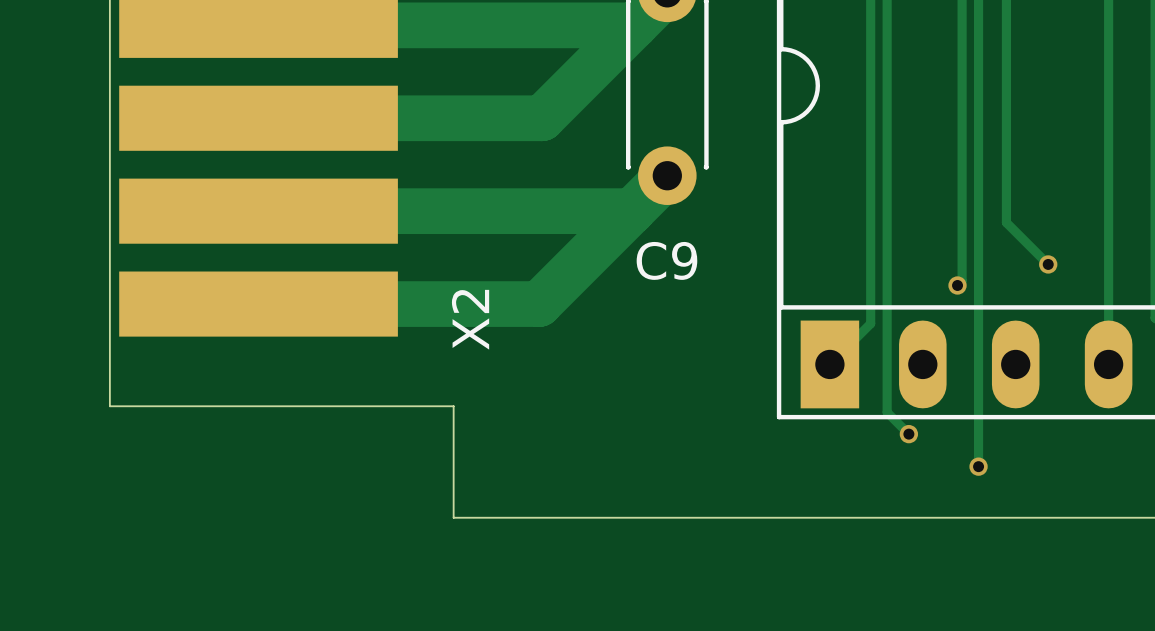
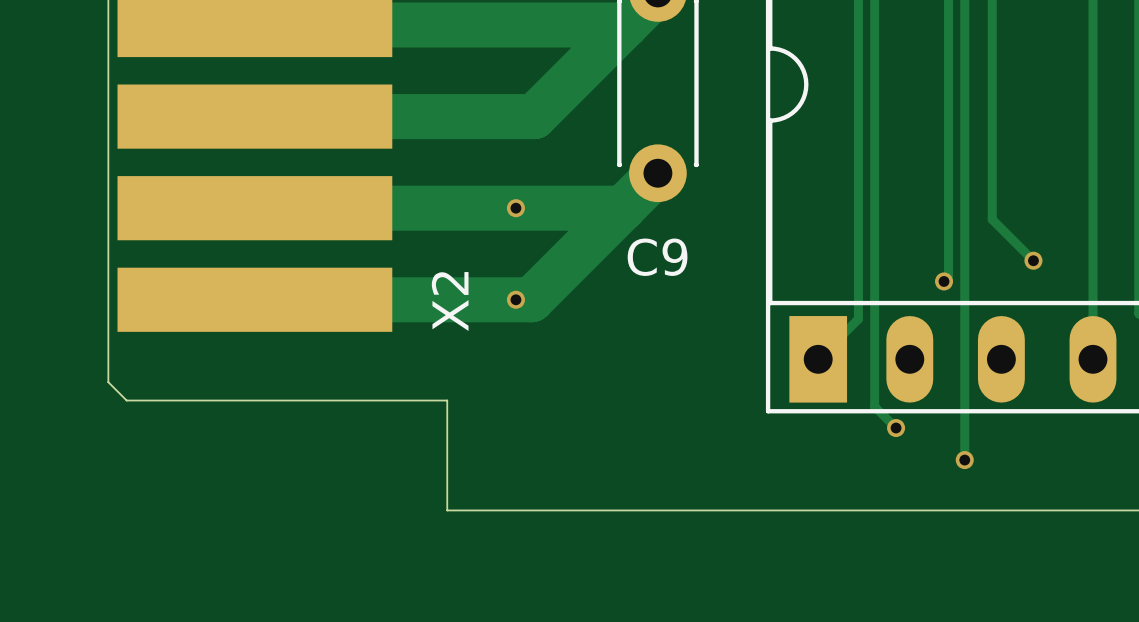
via: none -> (515, 208)
via: none -> (515, 299)
X2 name position: X2 (470, 319) -> X2 (450, 301)
board edge: (109, 387) (109, 406) (128, 406) -> (108, 382) (126, 400)

